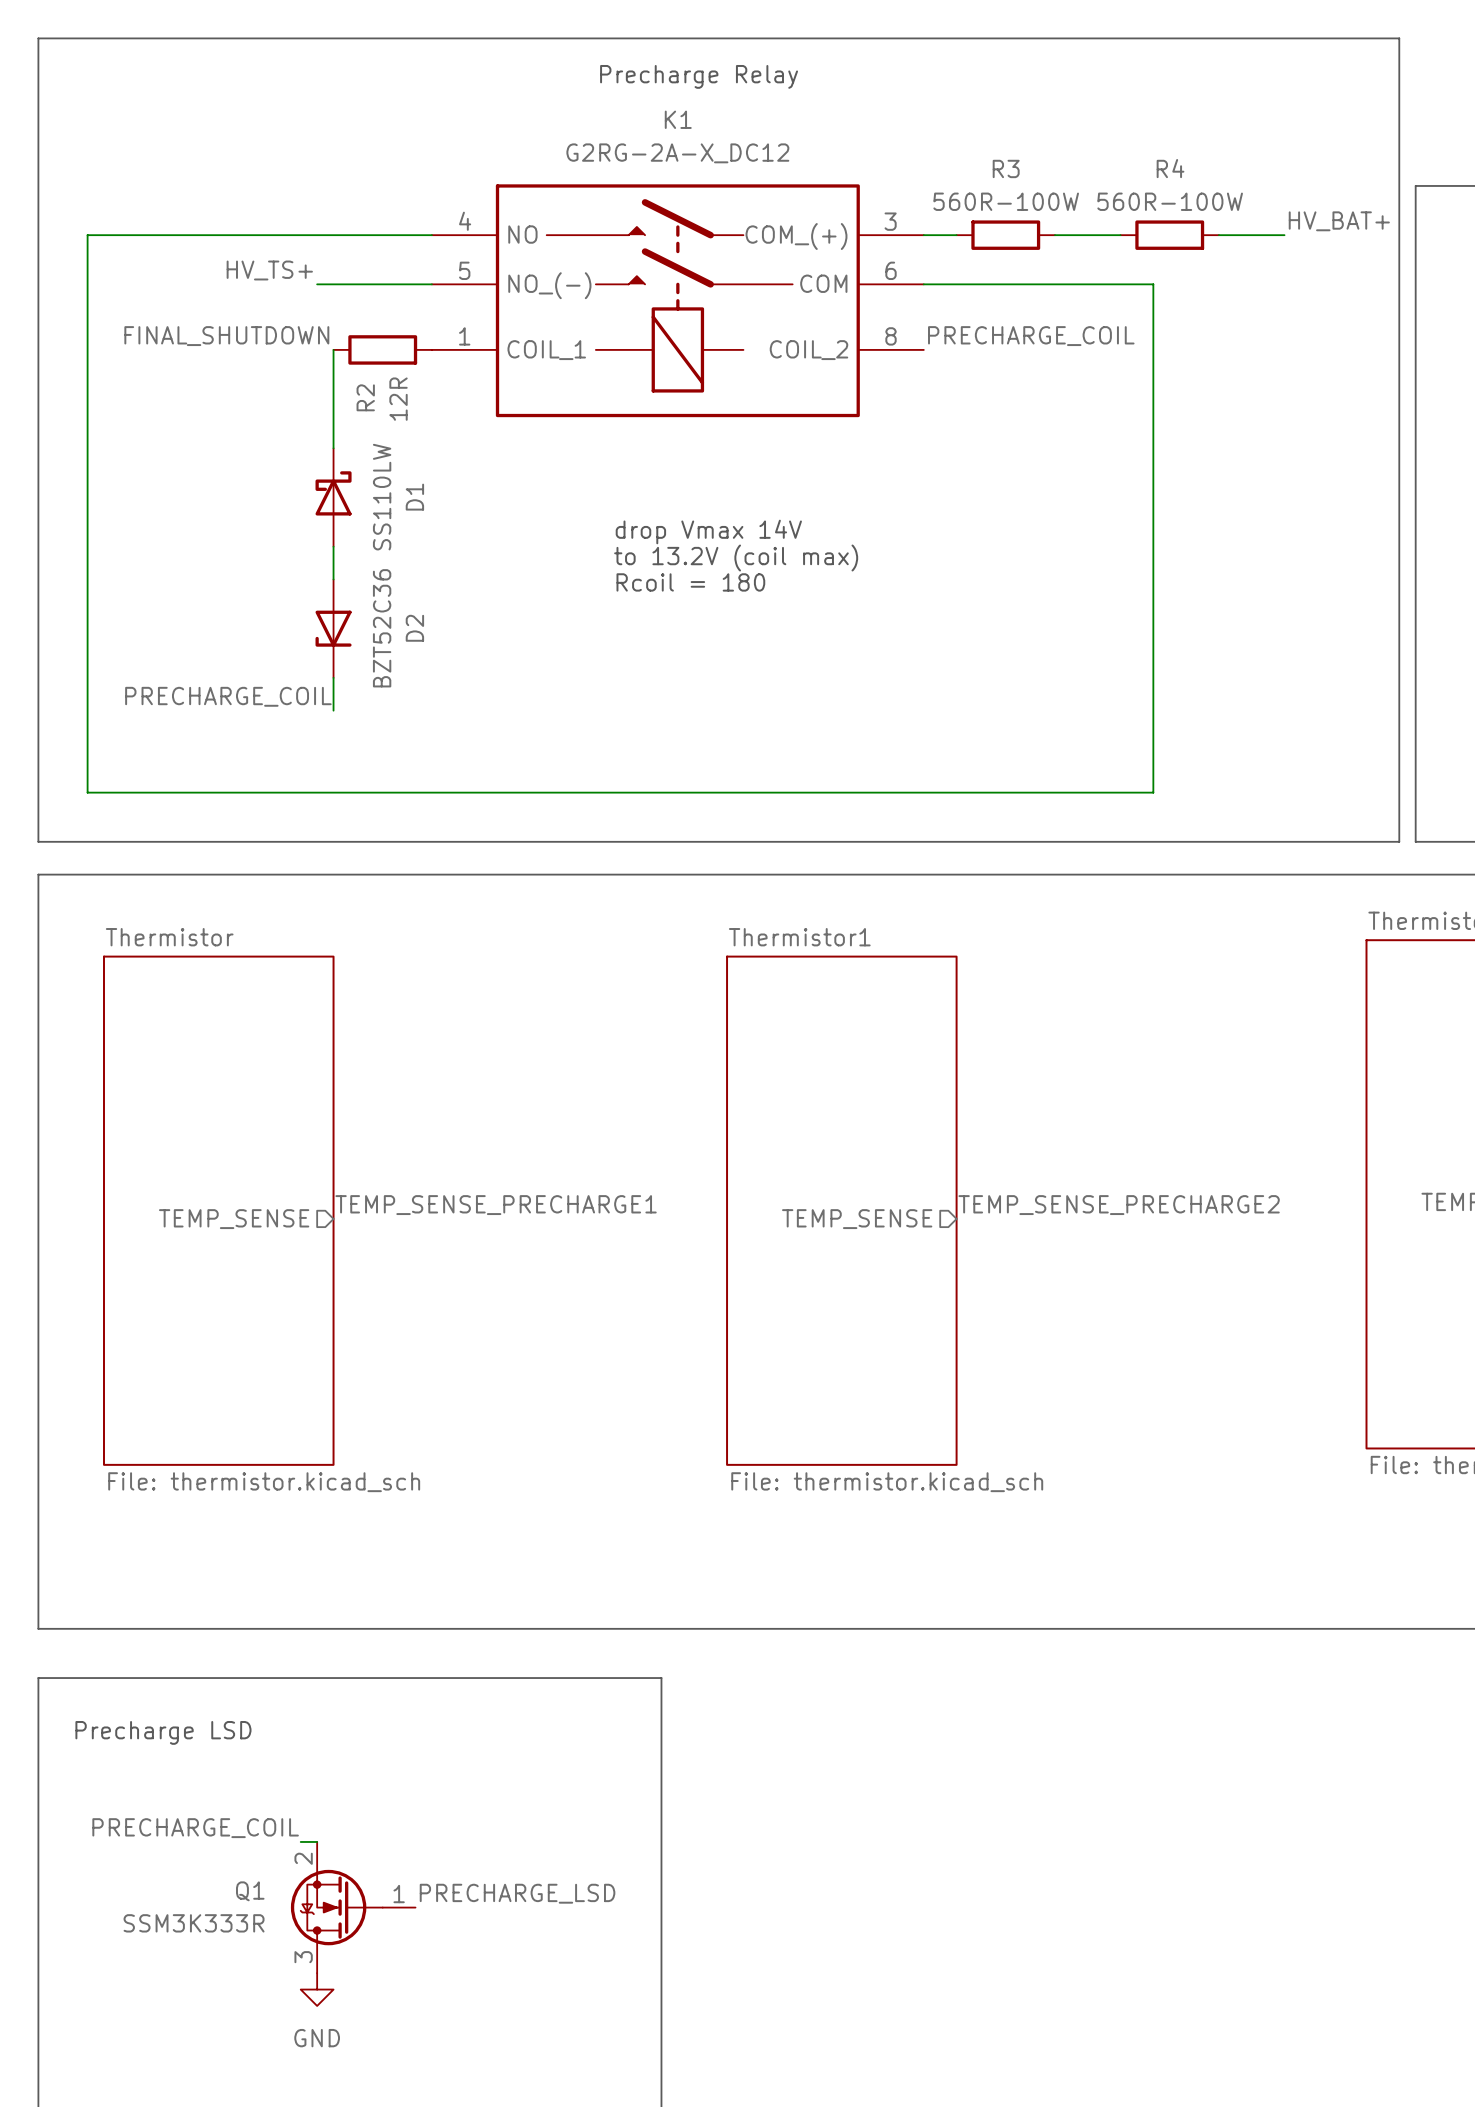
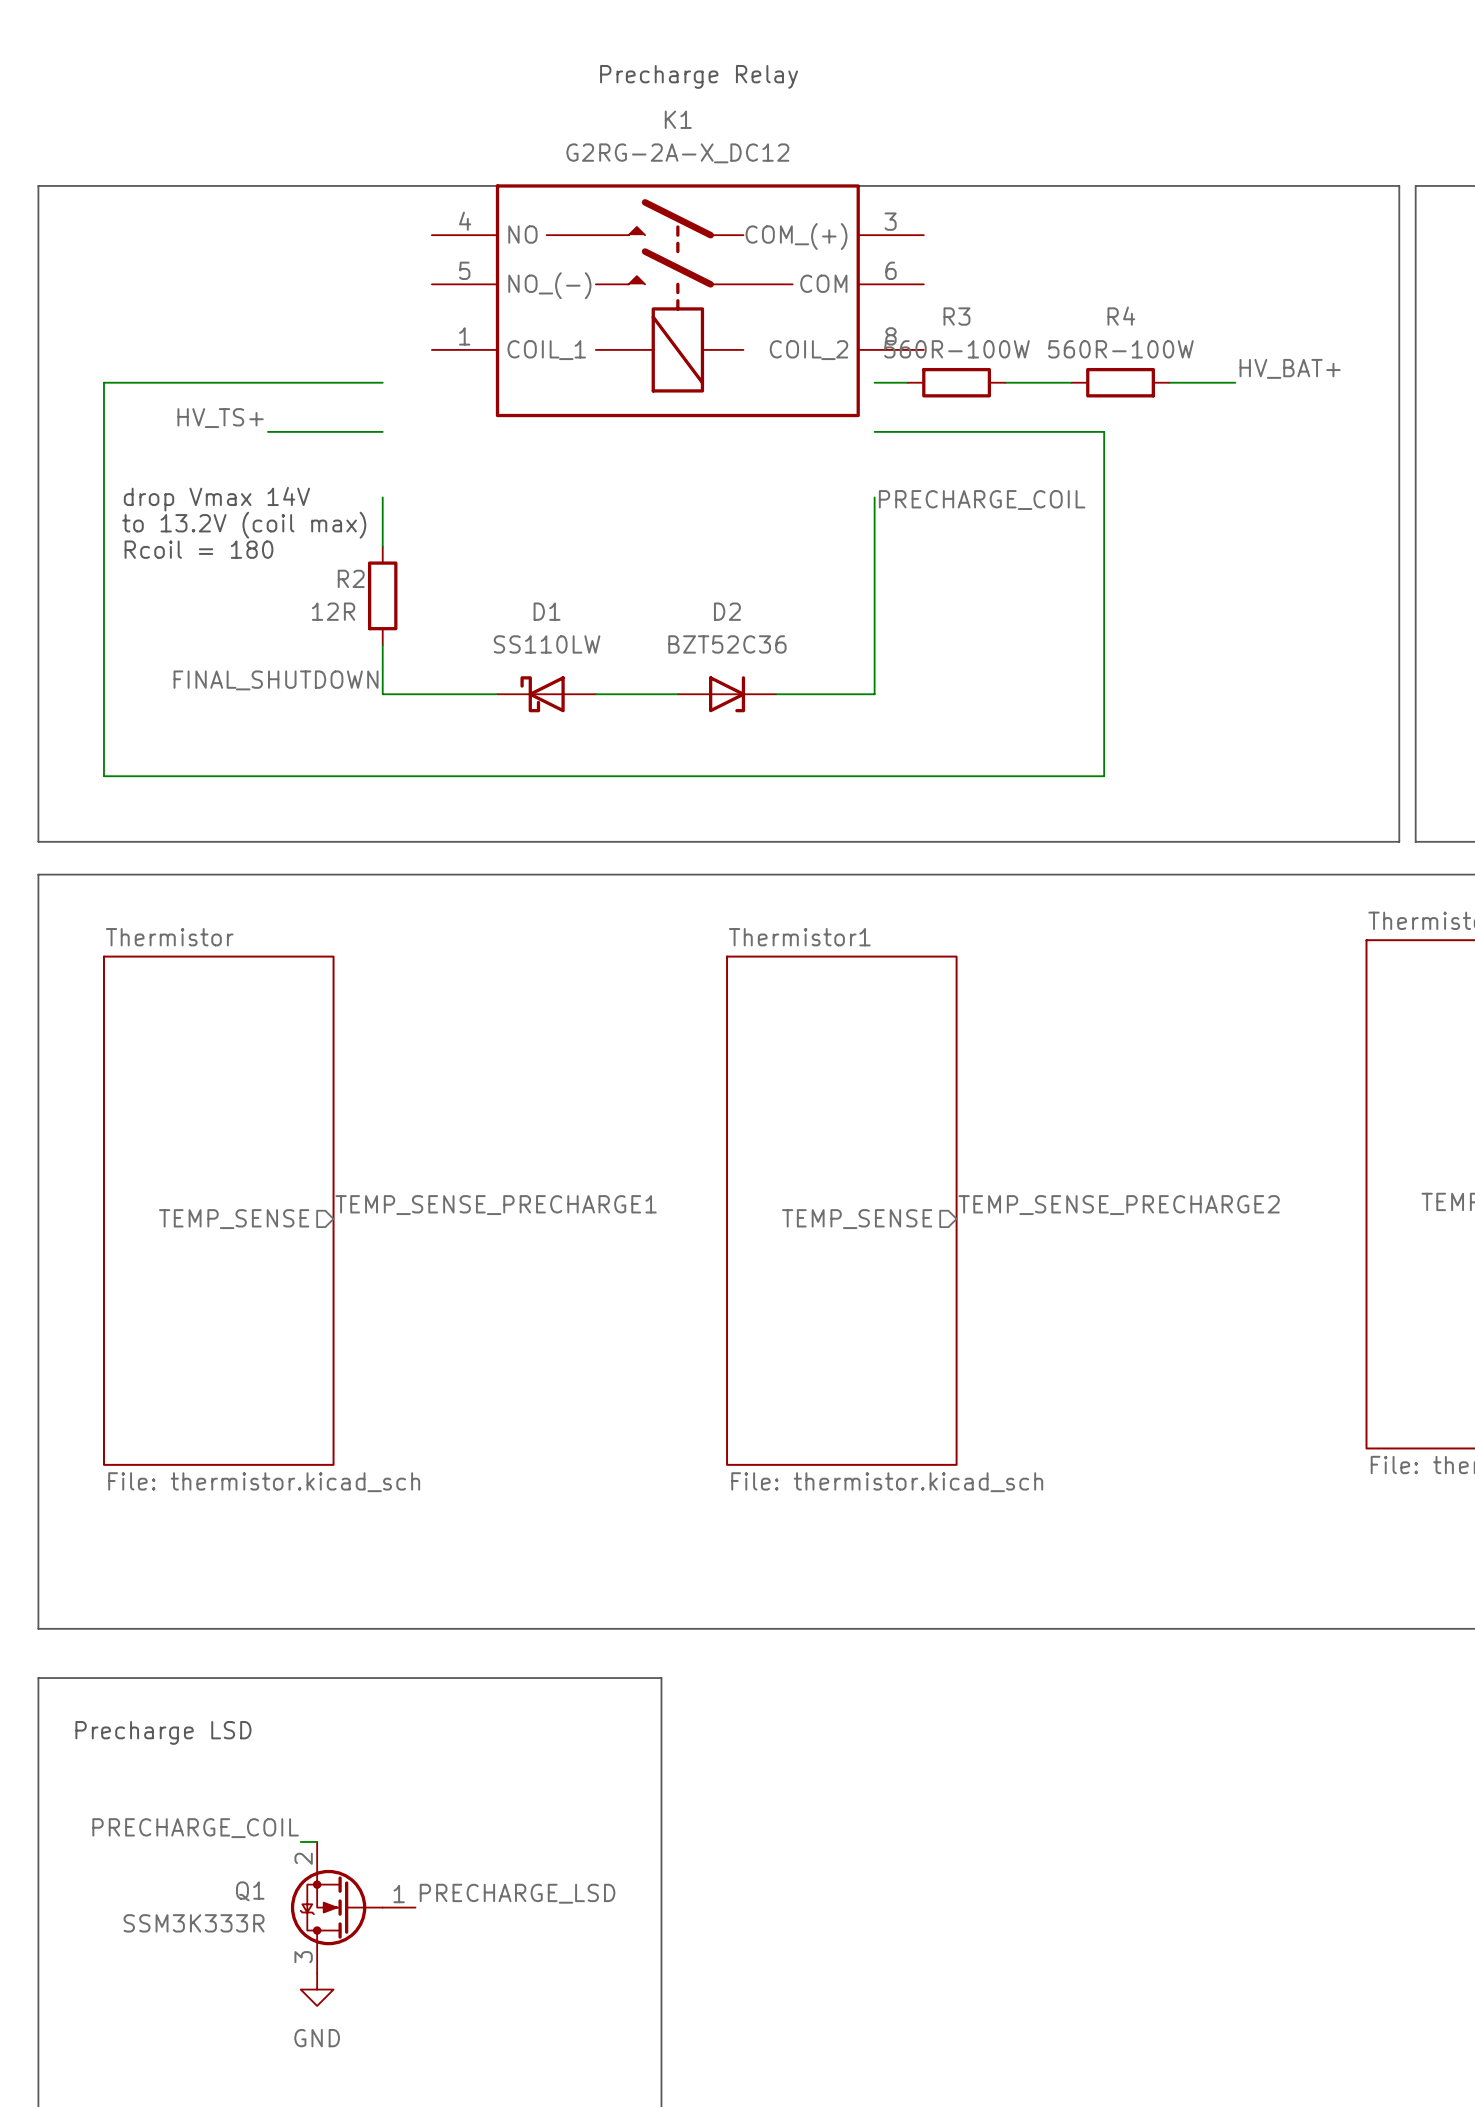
line: (38, 185) (38, 38) (1399, 38) (1399, 185) -> (38, 185) (1399, 185)
label position: HV_BAT+ (1339, 221) -> HV_BAT+ (1290, 368)
wire: (431, 235) (87, 235) (87, 792) (1153, 792) (1153, 284) (923, 284) -> none
wire: (923, 235) (956, 235) -> (874, 382) (907, 382)
R3 position: (1005, 235) -> (956, 382)
wire: (1054, 235) (1120, 235) -> (1005, 382) (1071, 382)
R4 position: (1169, 235) -> (1120, 382)
wire: (1218, 235) (1284, 235) -> (1169, 382) (1235, 382)
label position: HV_TS+ (269, 270) -> HV_TS+ (220, 418)
wire: (317, 284) (431, 284) -> (267, 431) (382, 431)
label: FINAL_SHUTDOWN (226, 336) -> none
label position: PRECHARGE_COIL (1031, 336) -> PRECHARGE_COIL (982, 500)
wire: (333, 349) (333, 448) -> none
R2 rotation: 0° (382, 349) -> 90° clockwise (382, 595)
R2 position: (382, 349) -> (382, 595)
wire: none -> (382, 382) (103, 382) (103, 776) (1104, 776) (1104, 431) (874, 431)
D1 rotation: 0° (333, 493) -> 90° counterclockwise (542, 694)
D1 position: (333, 497) -> (546, 694)
wire: none -> (382, 497) (382, 546)
wire: none -> (874, 497) (874, 694) (776, 694)
text: none -> drop Vmax 14V (216, 499)
text: none -> to 13.2V (coil max) (244, 525)
text: drop Vmax 14V (708, 531) -> none
wire: (333, 546) (333, 579) -> none
text: none -> Rcoil = 180 (198, 549)
text: to 13.2V (coil max) (736, 558) -> none
text: Rcoil = 180 (690, 582) -> none
D2 rotation: 0° (333, 628) -> 90° counterclockwise (727, 694)
D2 position: (333, 628) -> (727, 694)
wire: none -> (382, 645) (382, 694) (497, 694)
wire: (333, 677) (333, 710) -> none
label: none -> FINAL_SHUTDOWN (276, 680)
wire: none -> (595, 694) (677, 694)
label: PRECHARGE_COIL (228, 696) -> none

